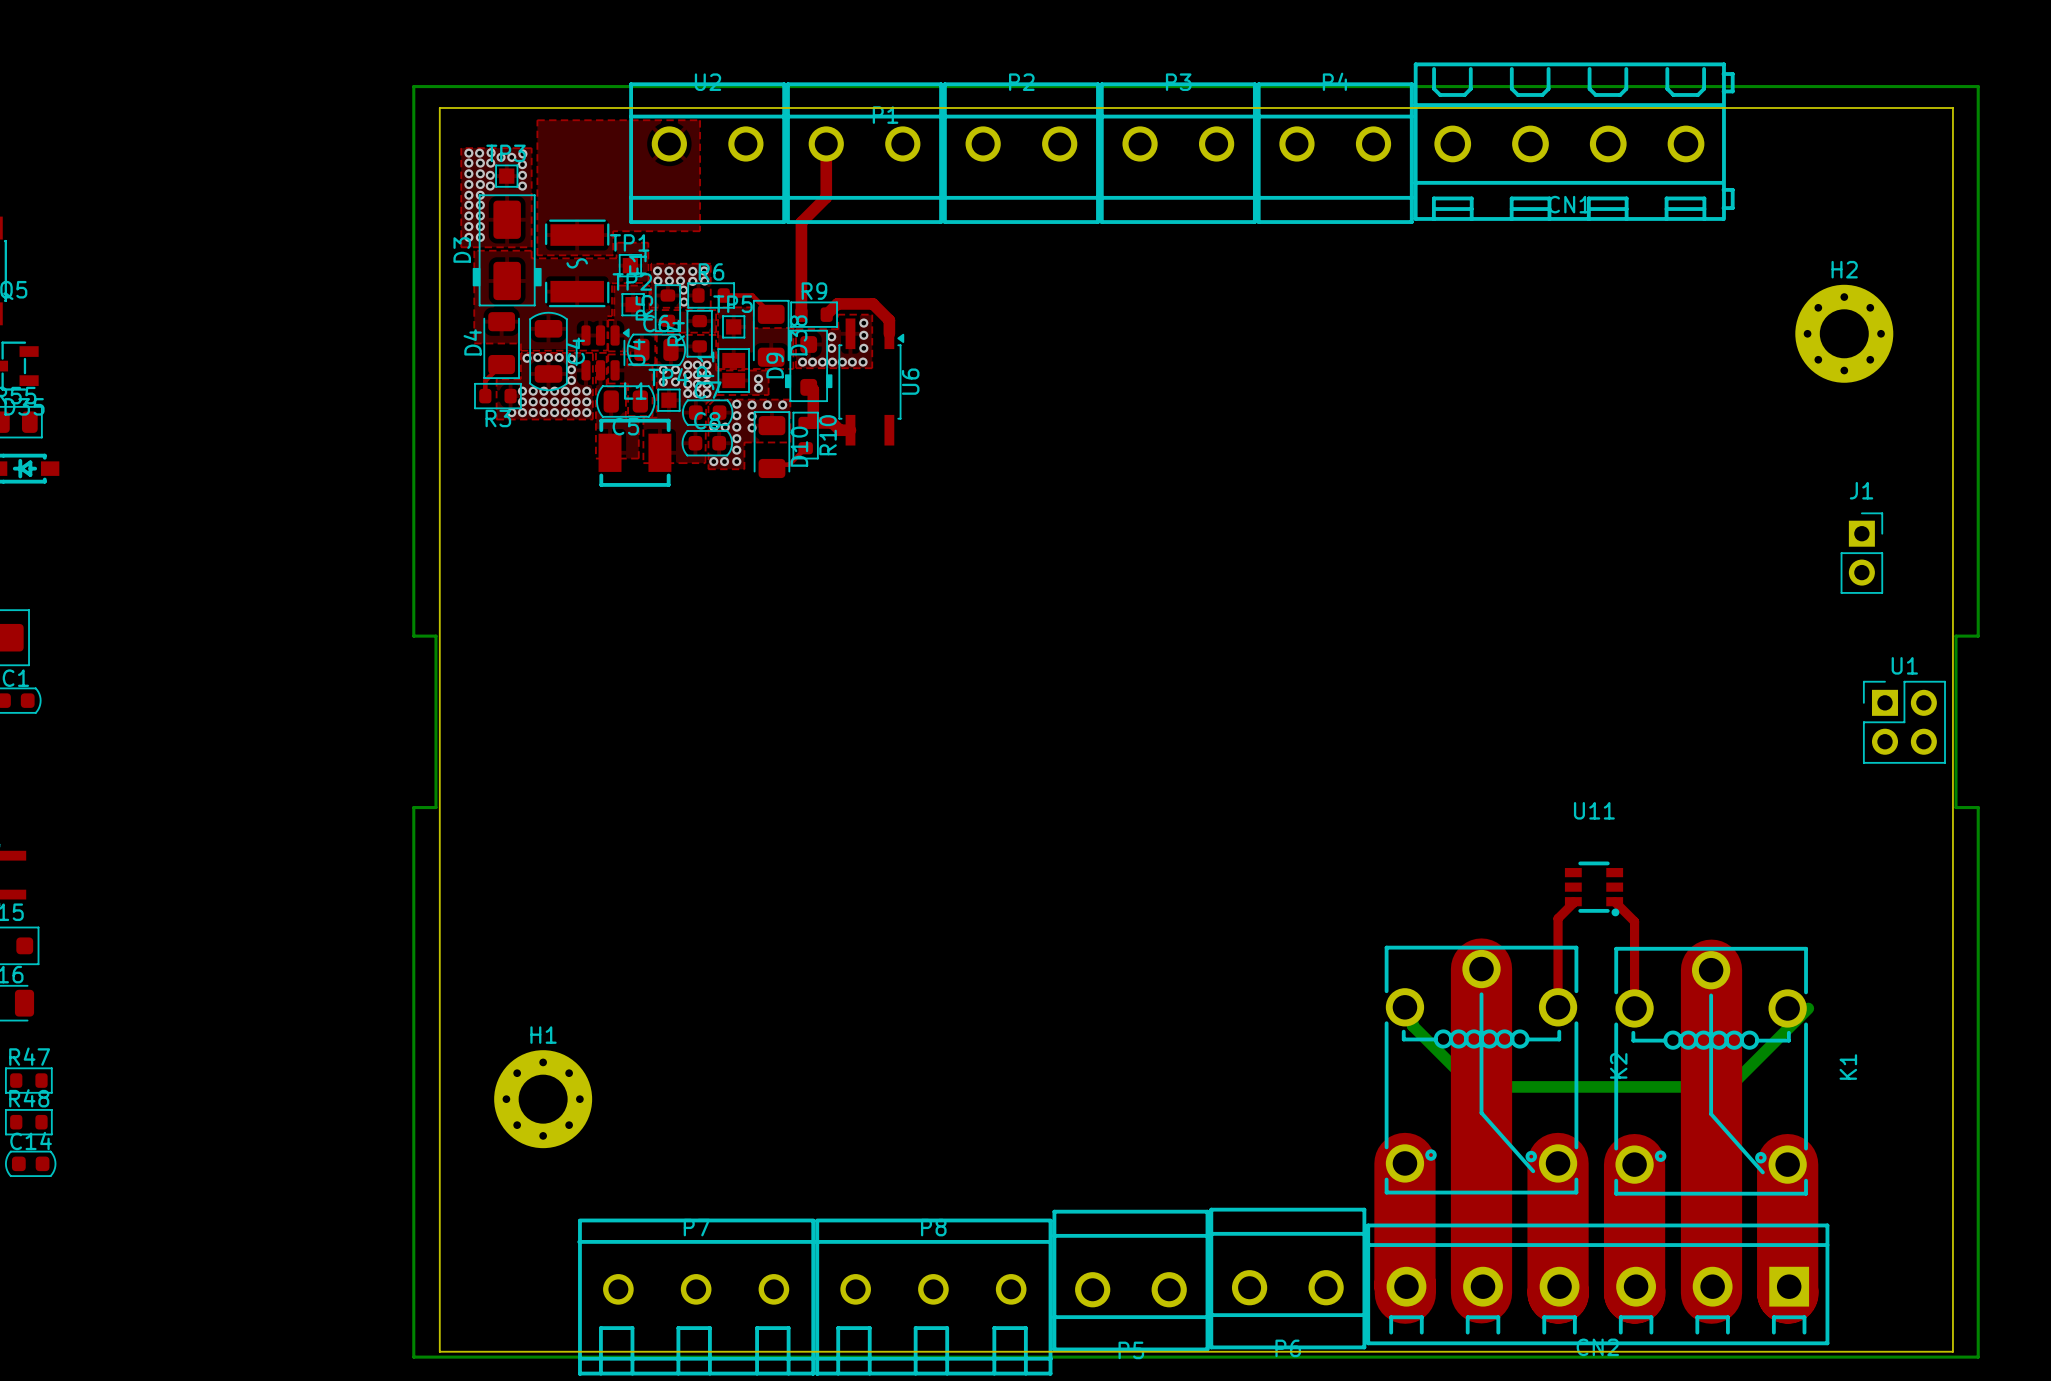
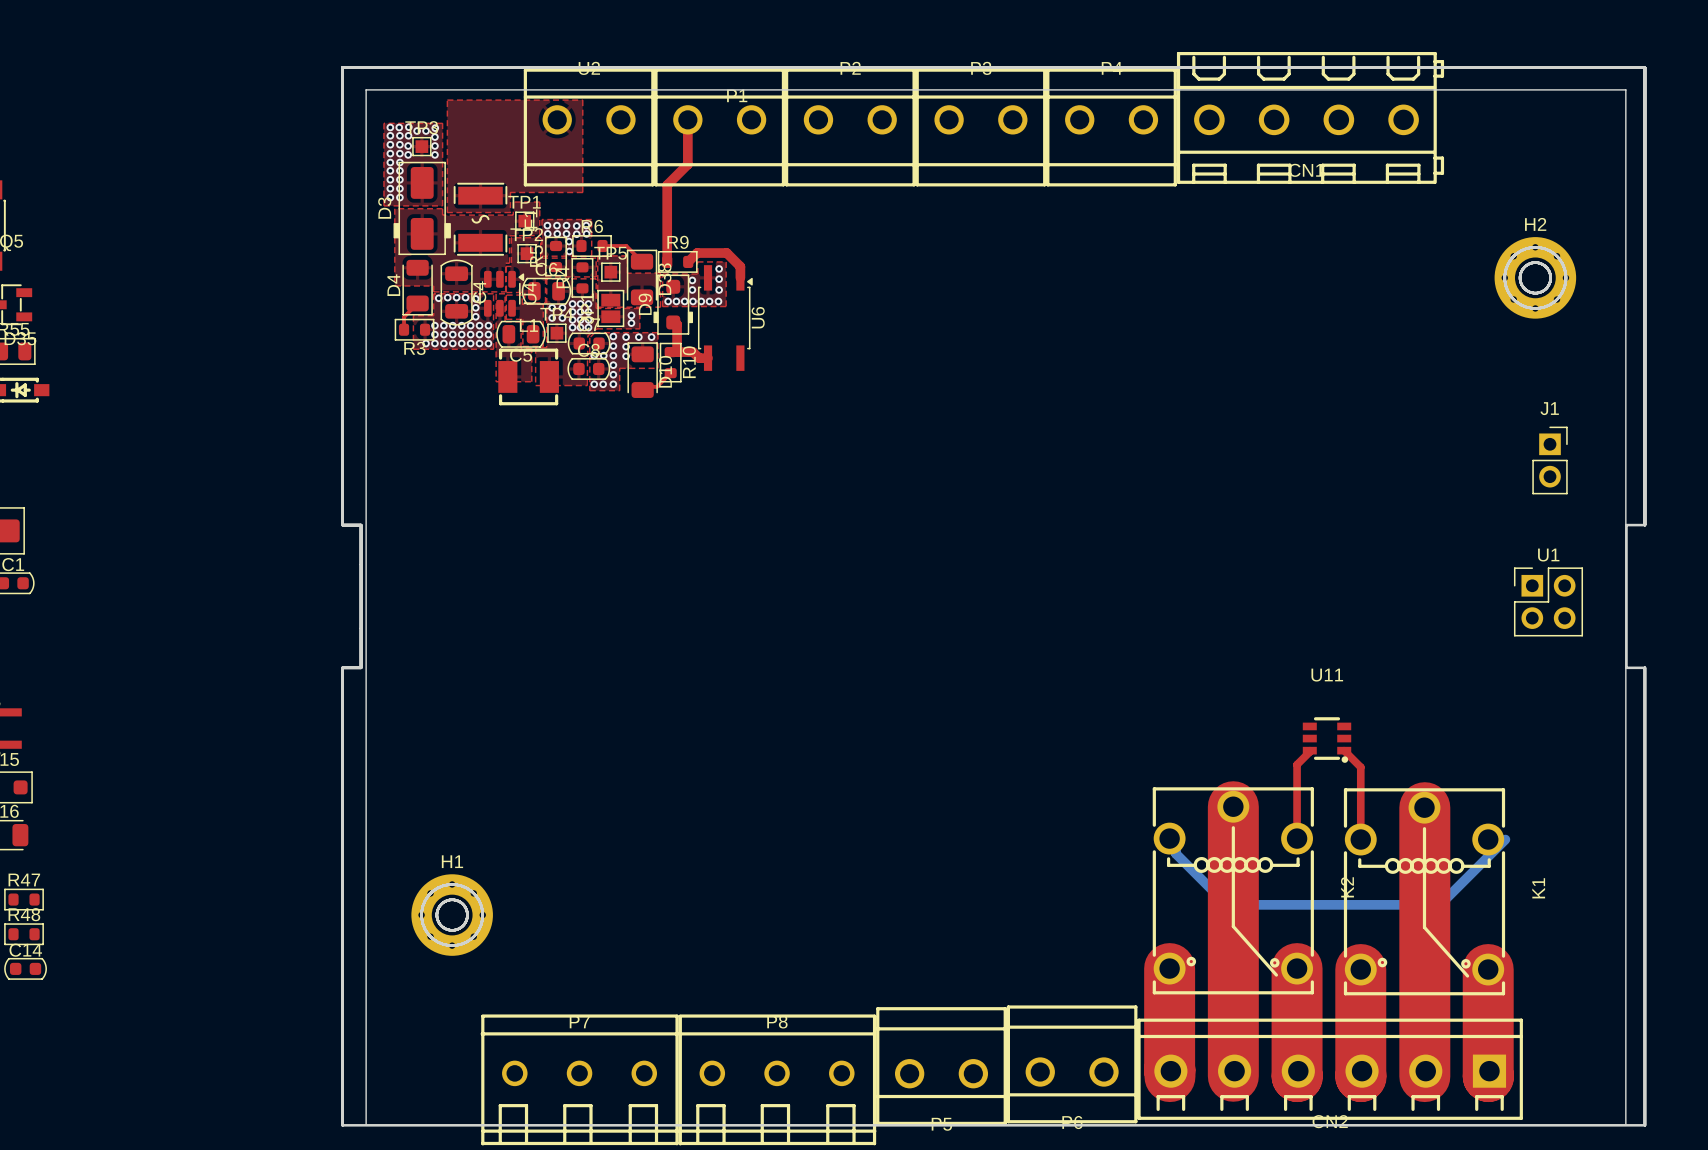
board edge: none -> (342, 67) (342, 525) (361, 525) (361, 667) (342, 667) (342, 1125) (1644, 1125) (1644, 667) (1626, 667) (1626, 525) (1644, 525) (1644, 67) (342, 67)
bottom track: (413, 86) (1978, 86) (1978, 636) (1956, 636) (1956, 807) (1978, 807) (1978, 1357) (413, 1357) (413, 807) (435, 807) (435, 636) (413, 636) (413, 86) -> none
round board edge: none -> [1503, 246, 1568, 310]
round board edge: none -> [1518, 261, 1552, 295]
U1 position: (1904, 722) -> (1548, 601)
round board edge: none -> [420, 883, 485, 947]
round board edge: none -> [435, 898, 469, 932]

